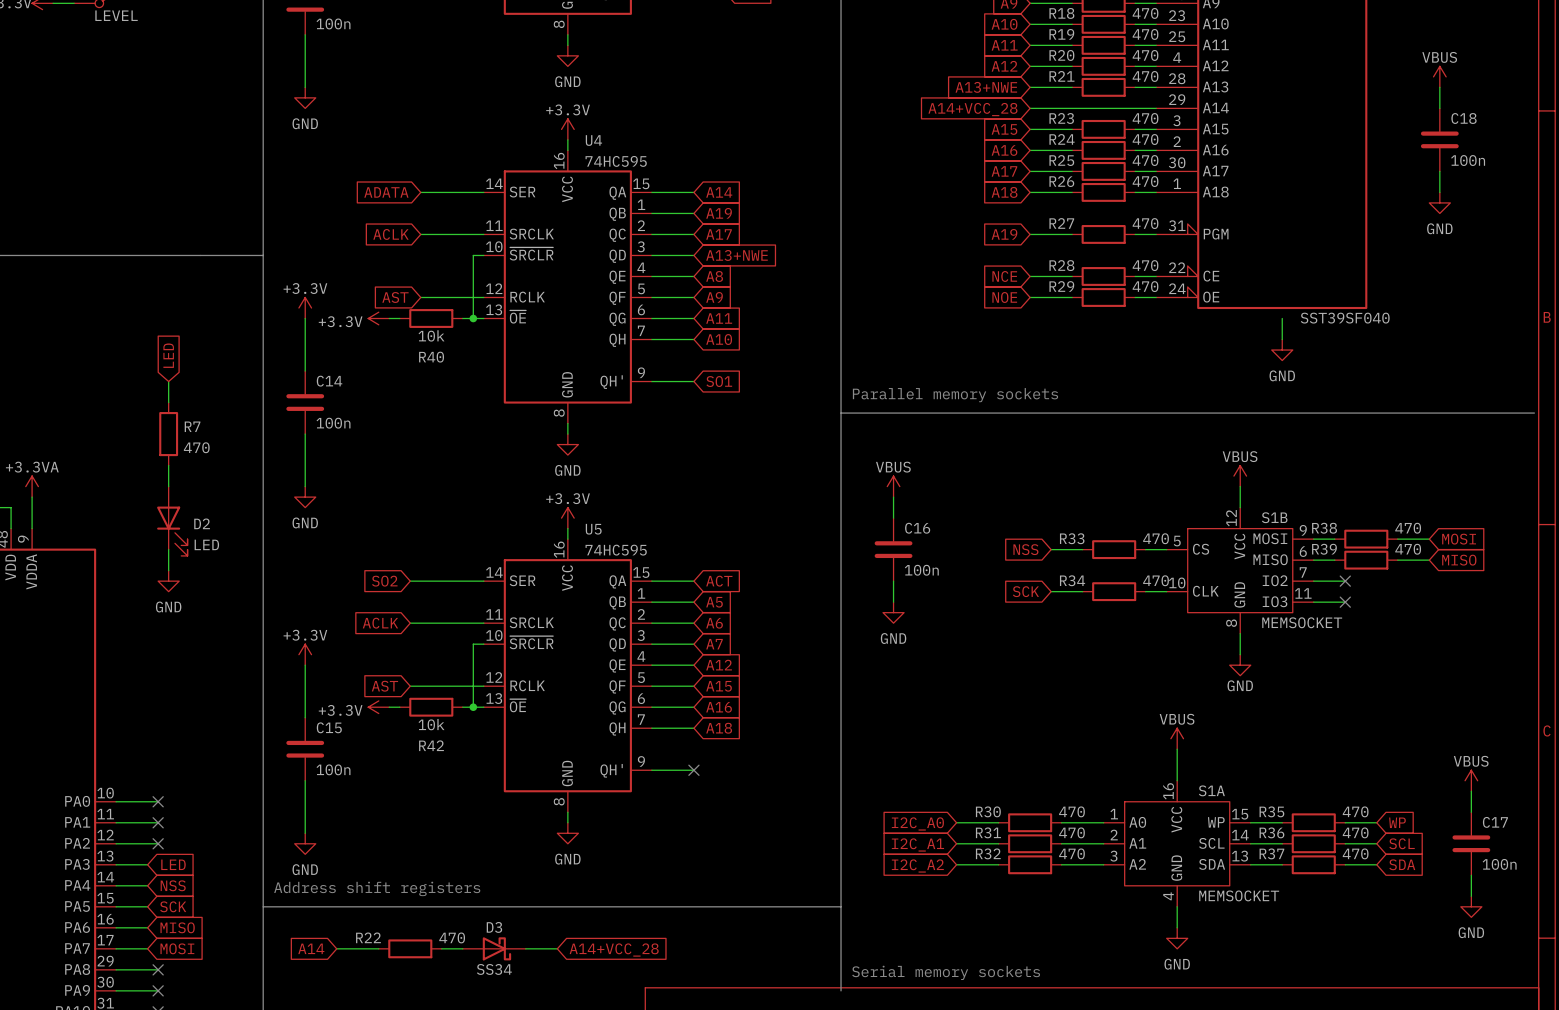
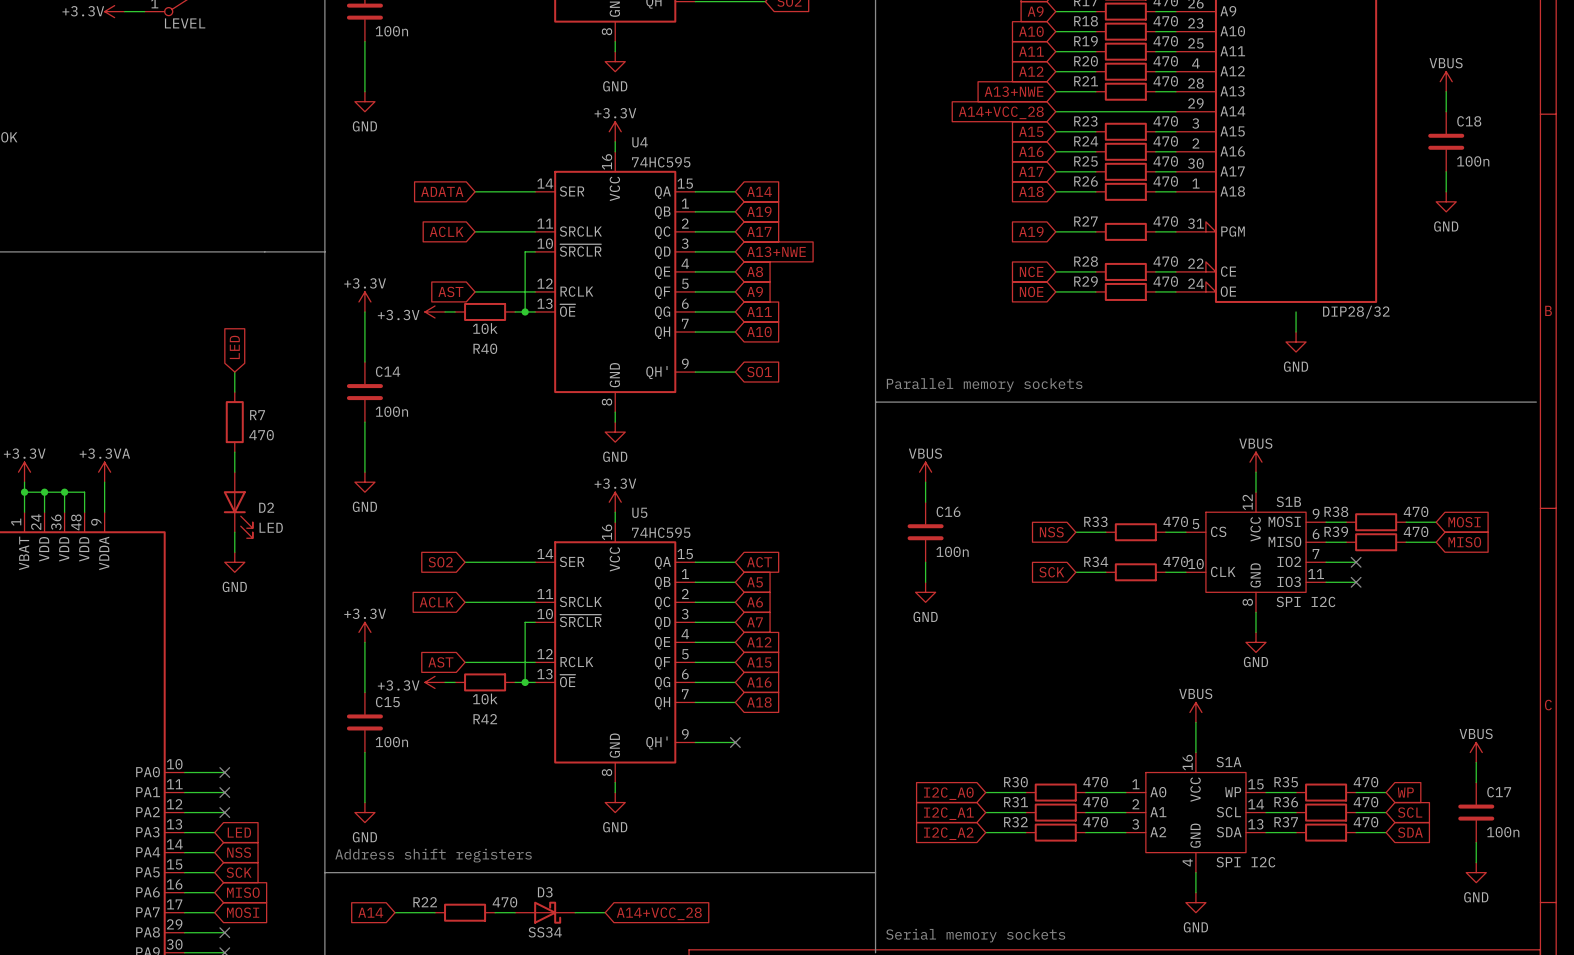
part value: SST39SF040 (1345, 318) -> DIP28/32 (1356, 312)
S1B value: MEMSOCKET (1302, 622) -> SPI I2C (1306, 601)
S1A value: MEMSOCKET (1239, 895) -> SPI I2C (1245, 862)

